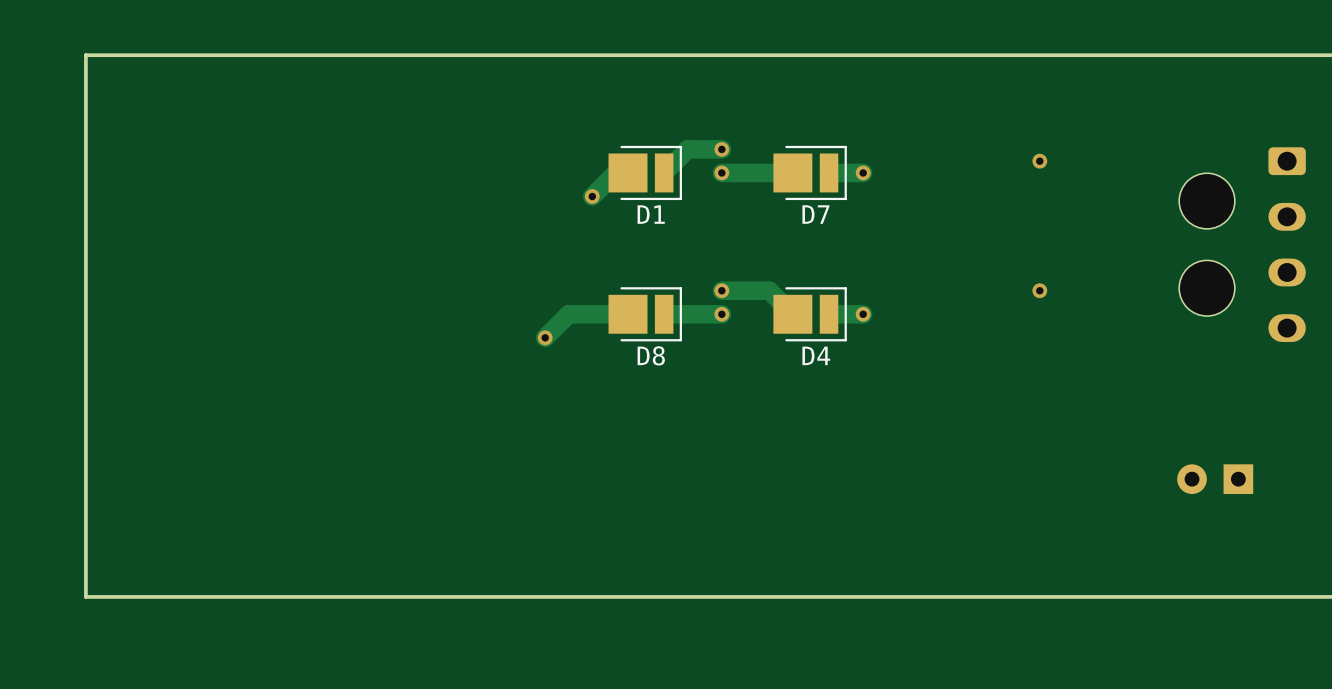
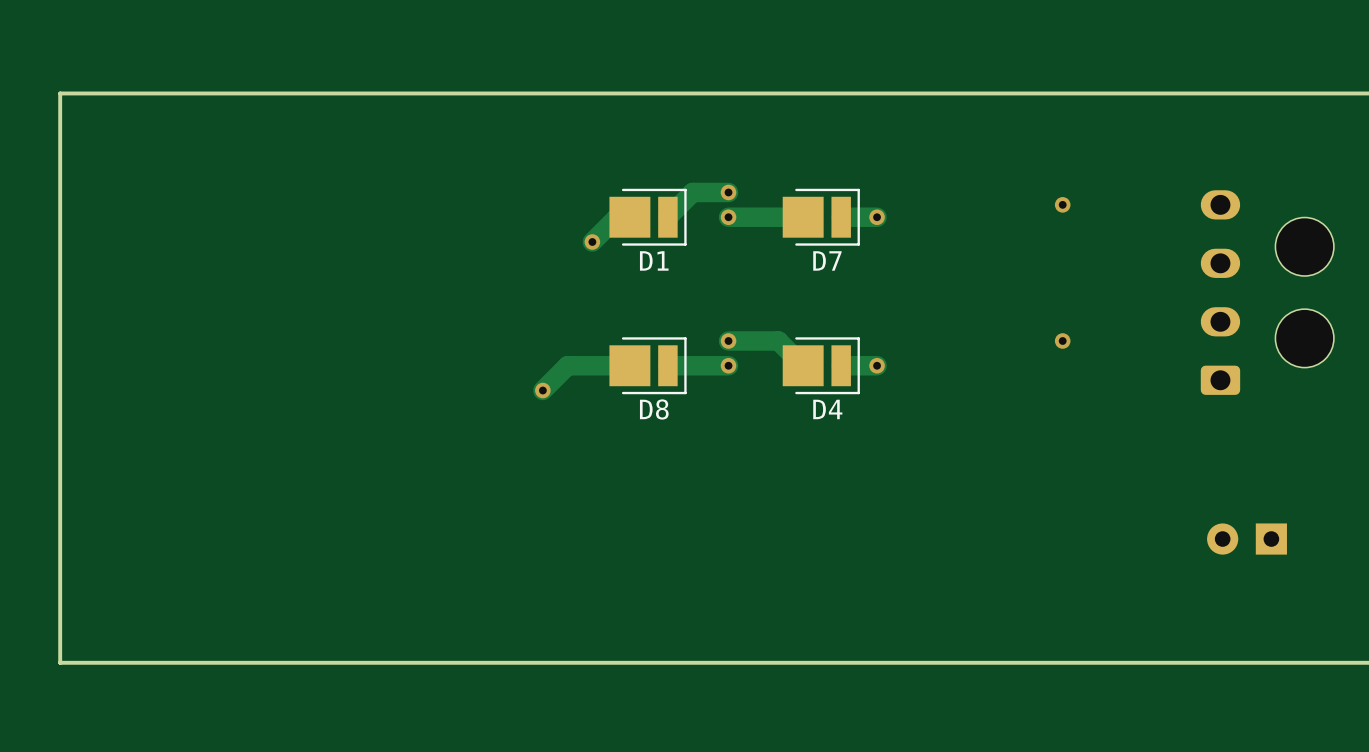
part rotation: 0° (1242, 244) -> 180° (1267, 292)

